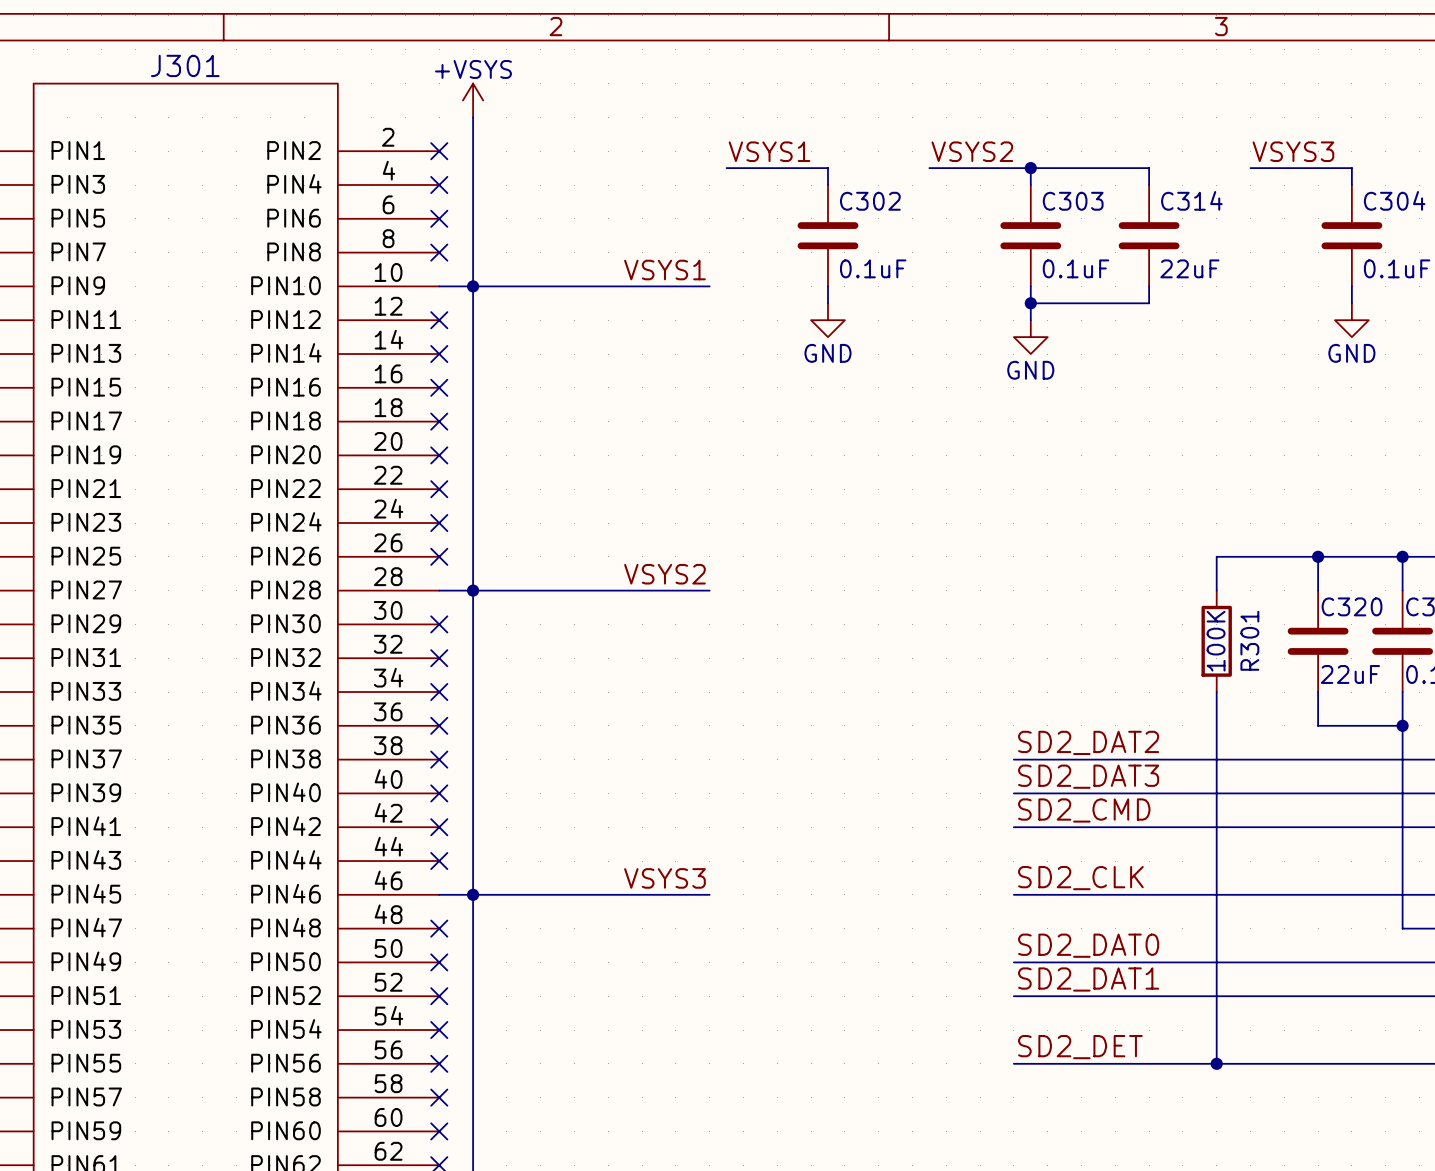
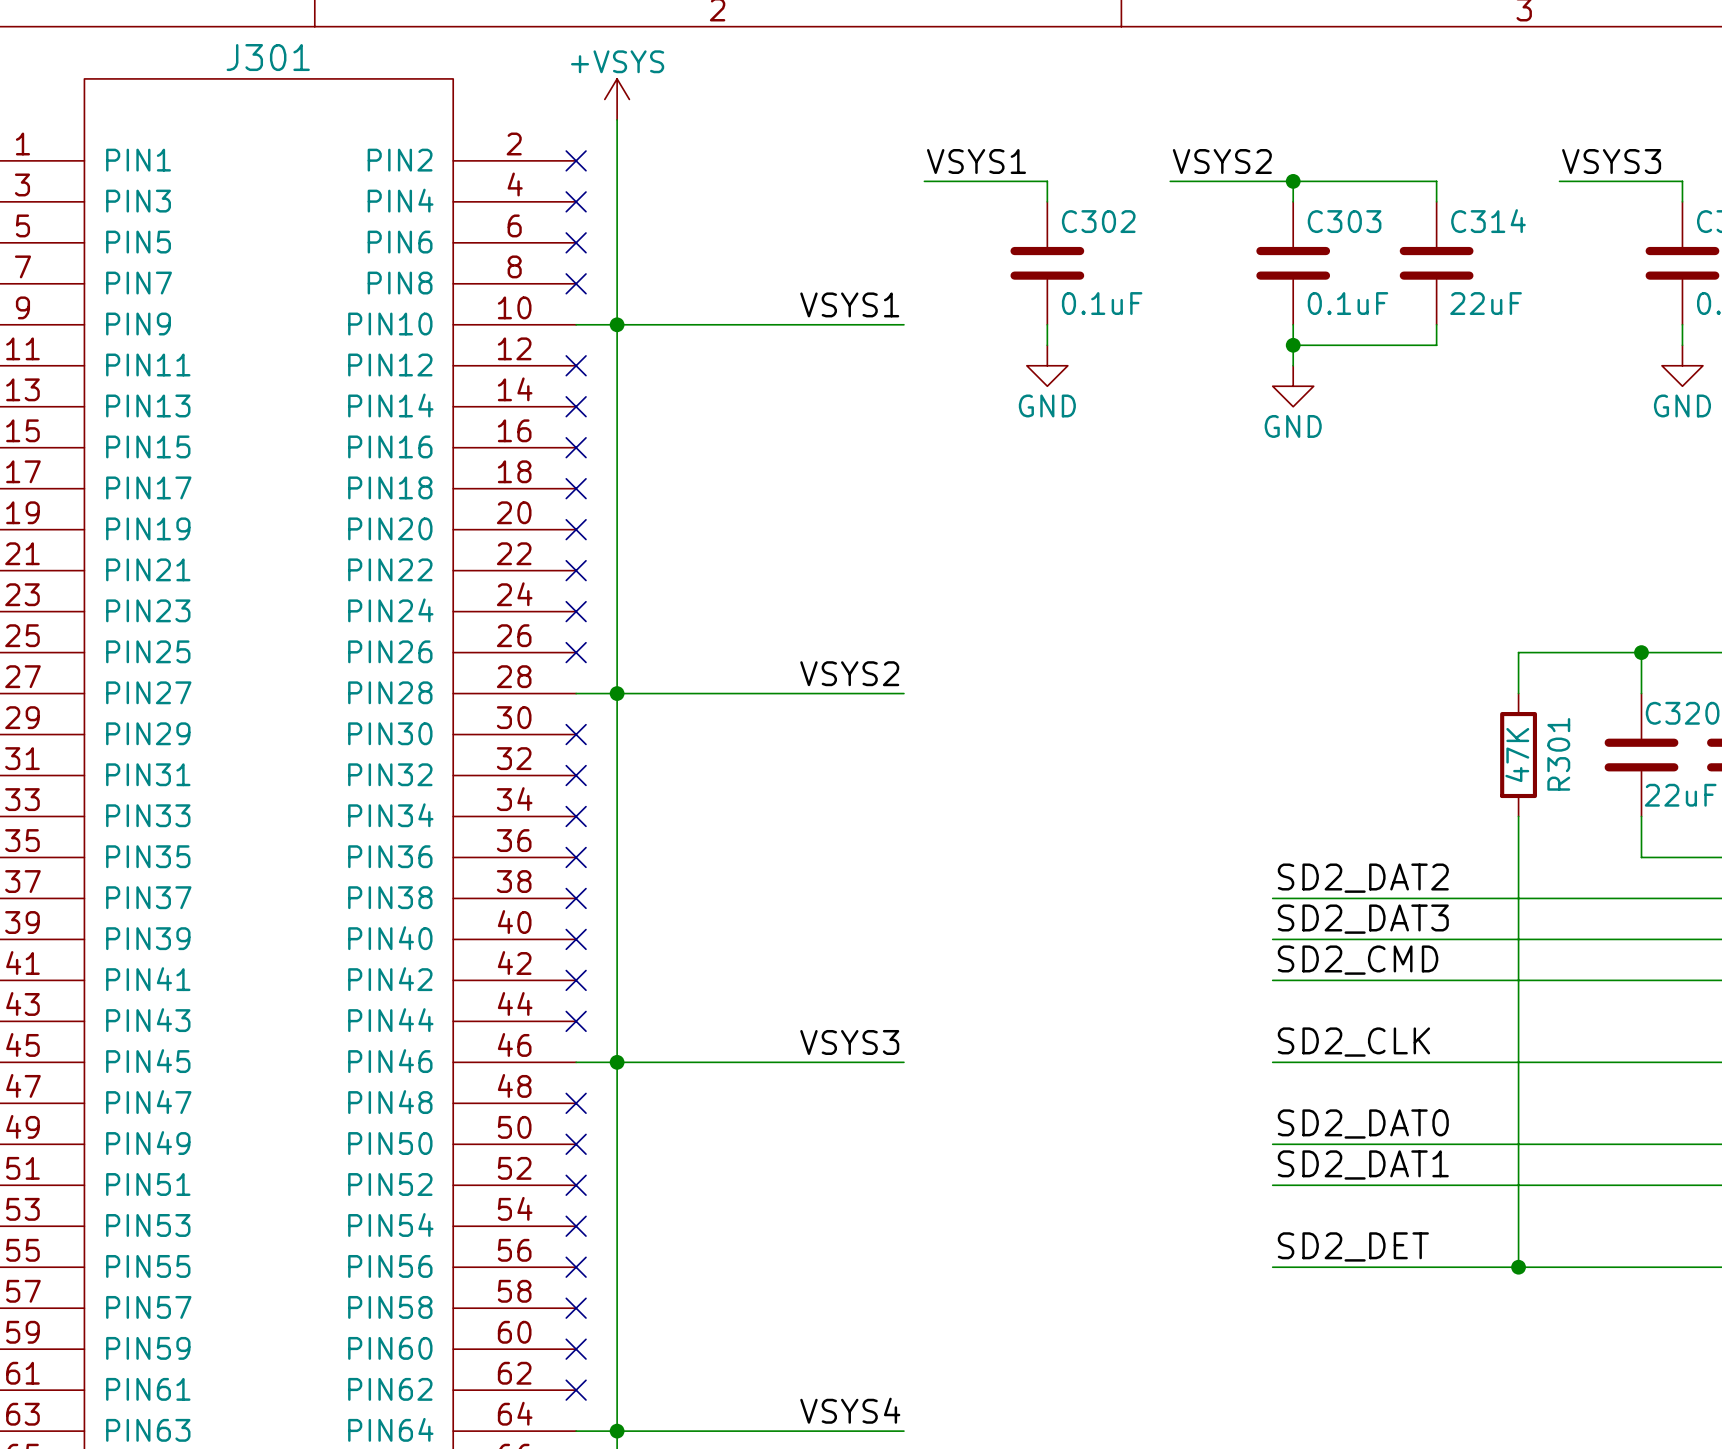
R301 value: 100K (1216, 641) -> 47K (1517, 755)

